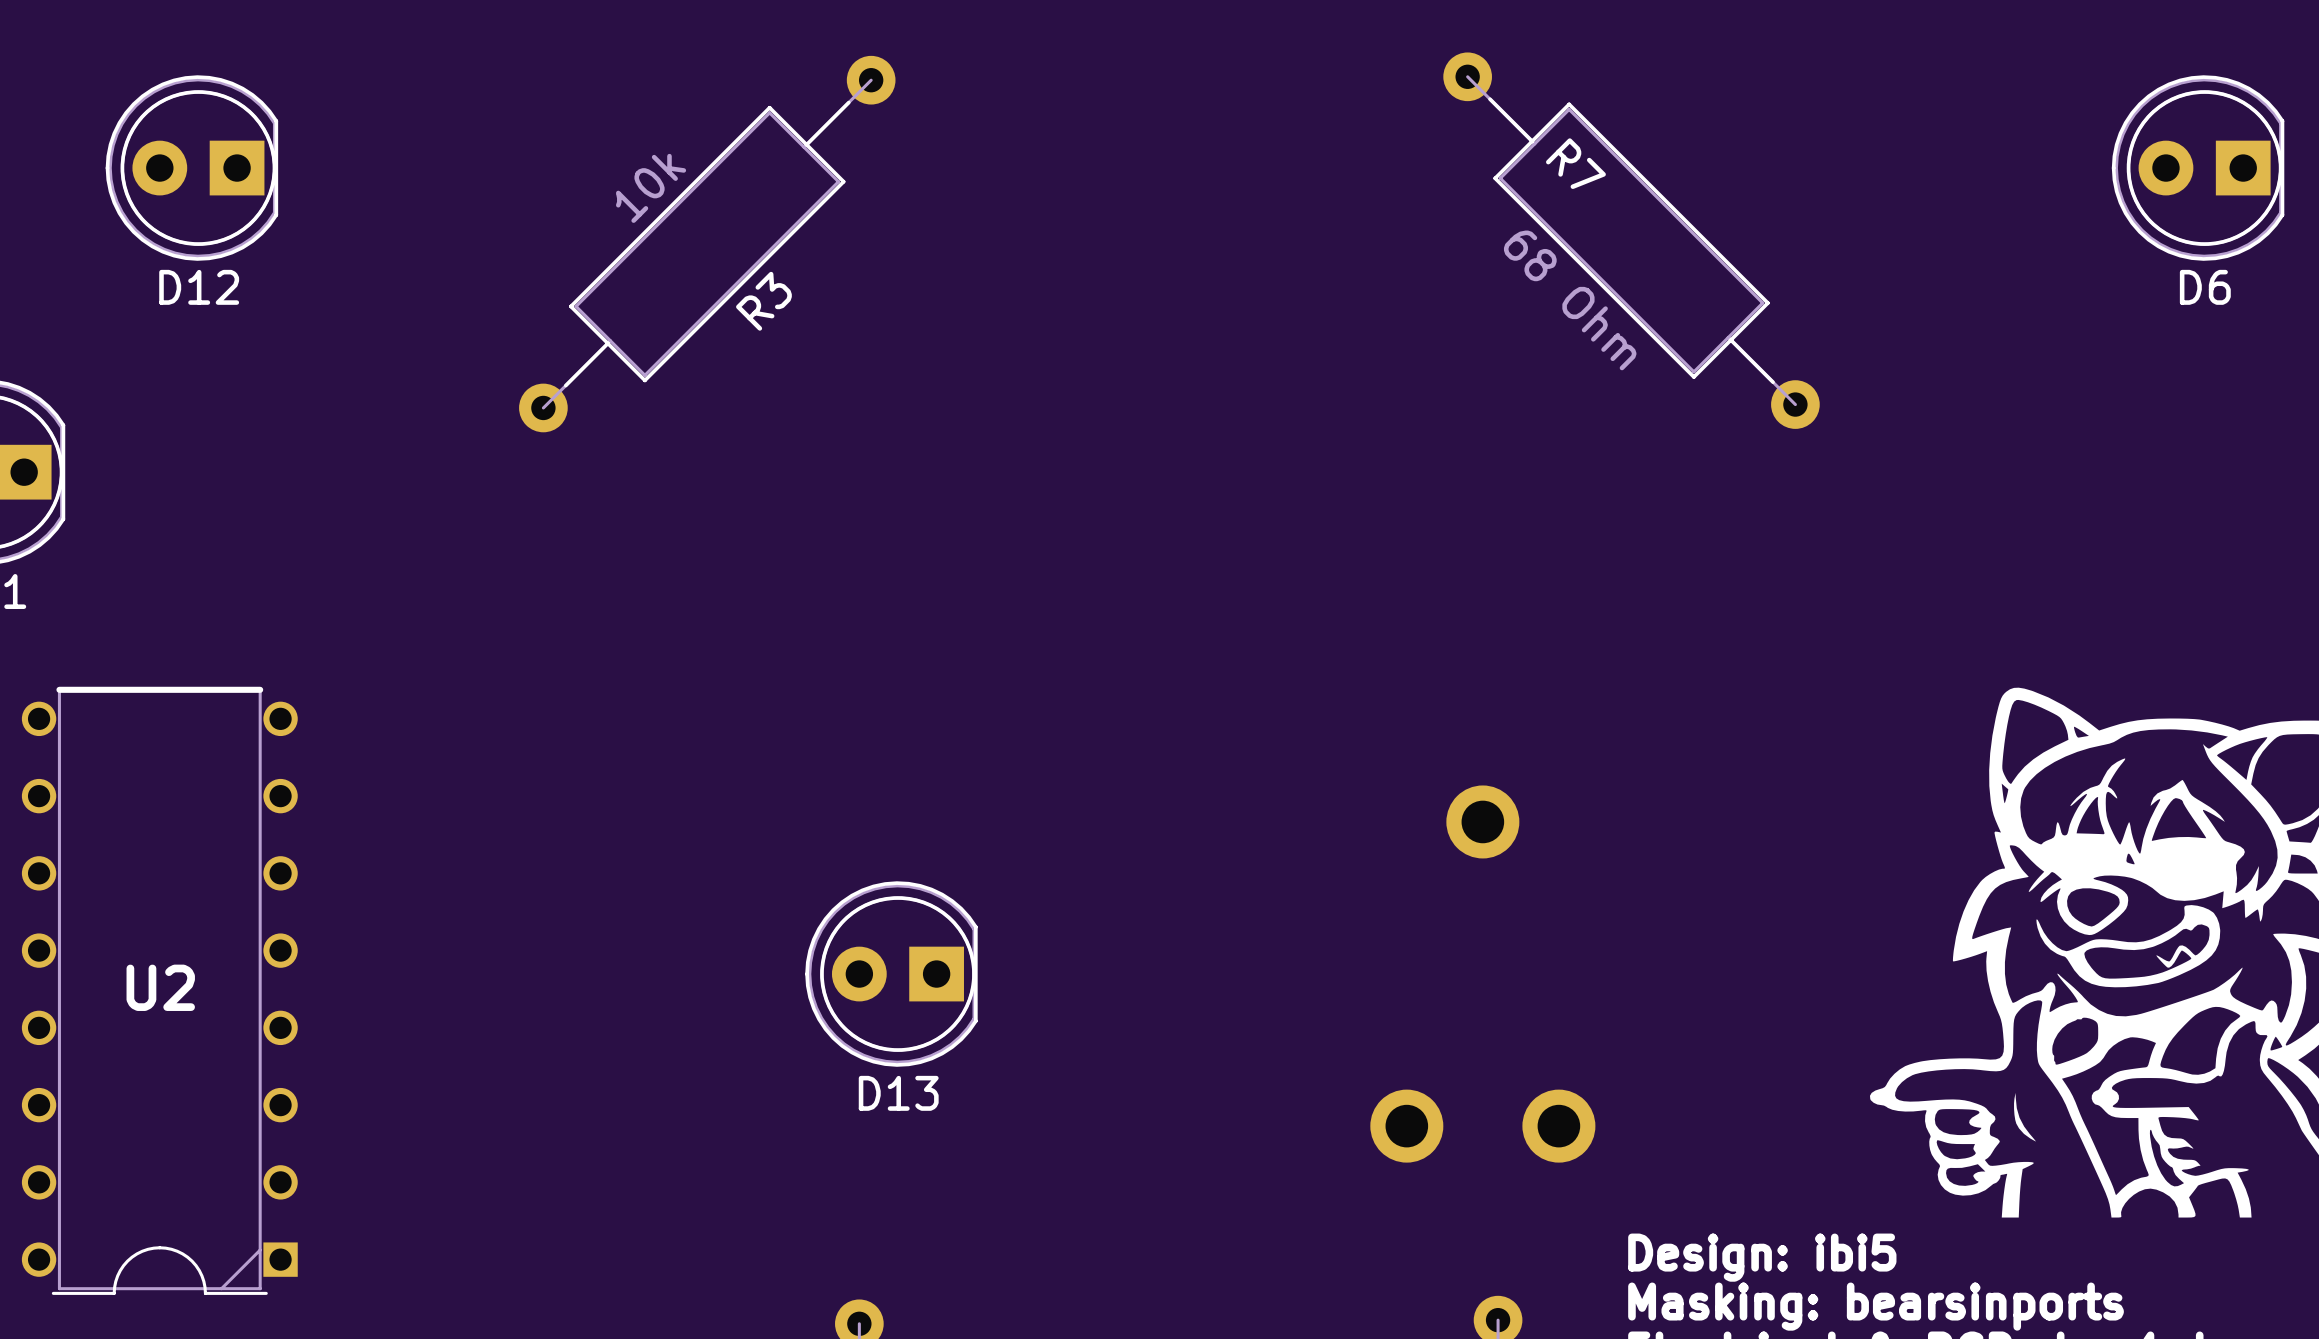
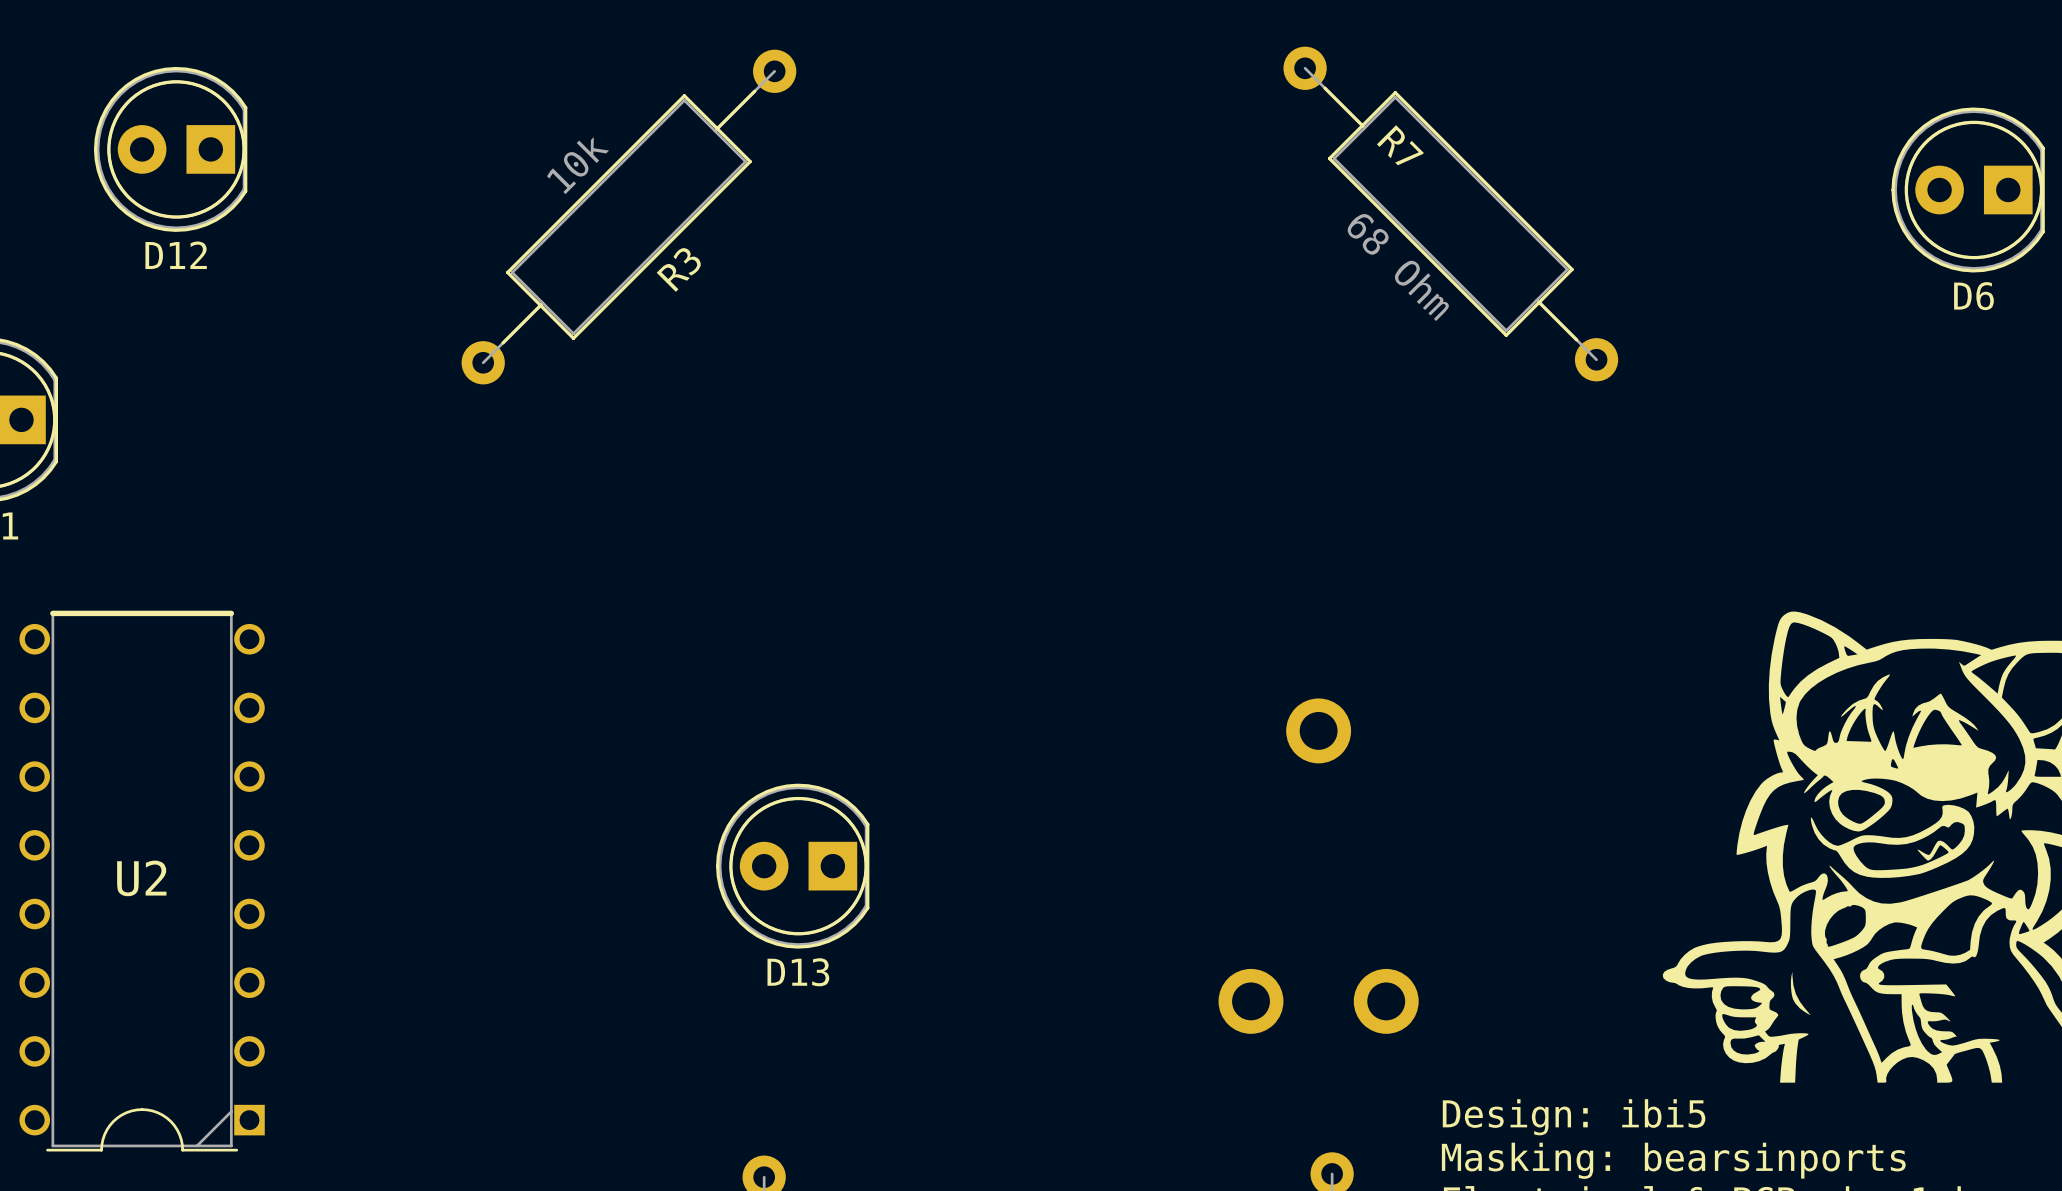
D6 position: (2198, 168) -> (1968, 190)

